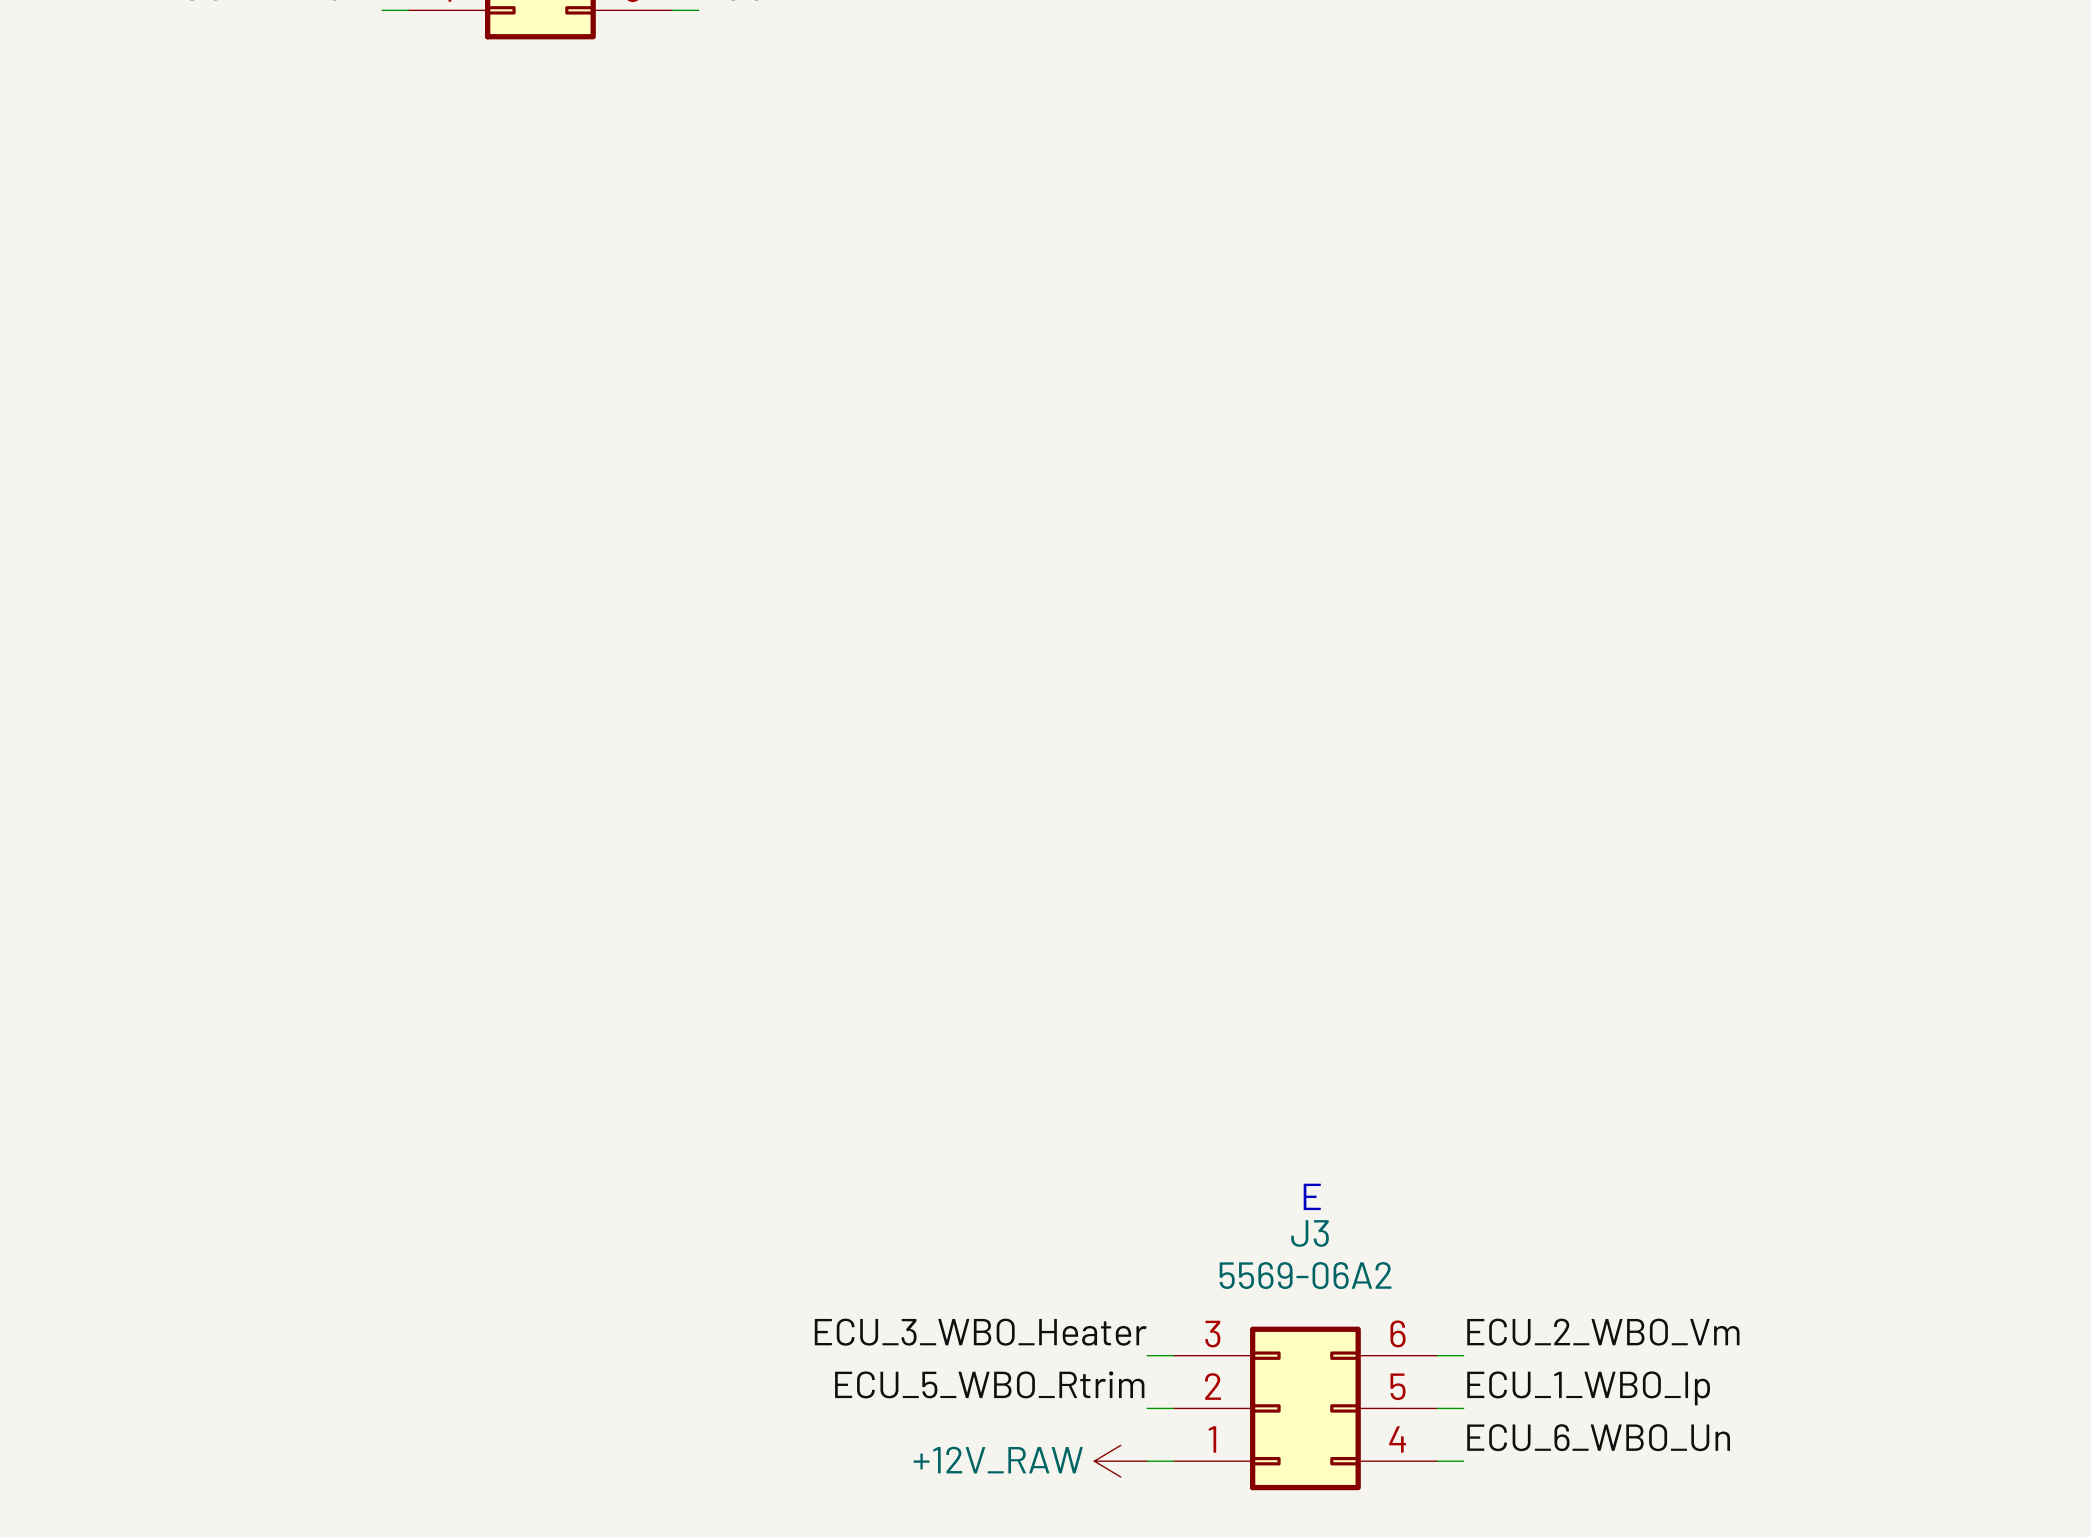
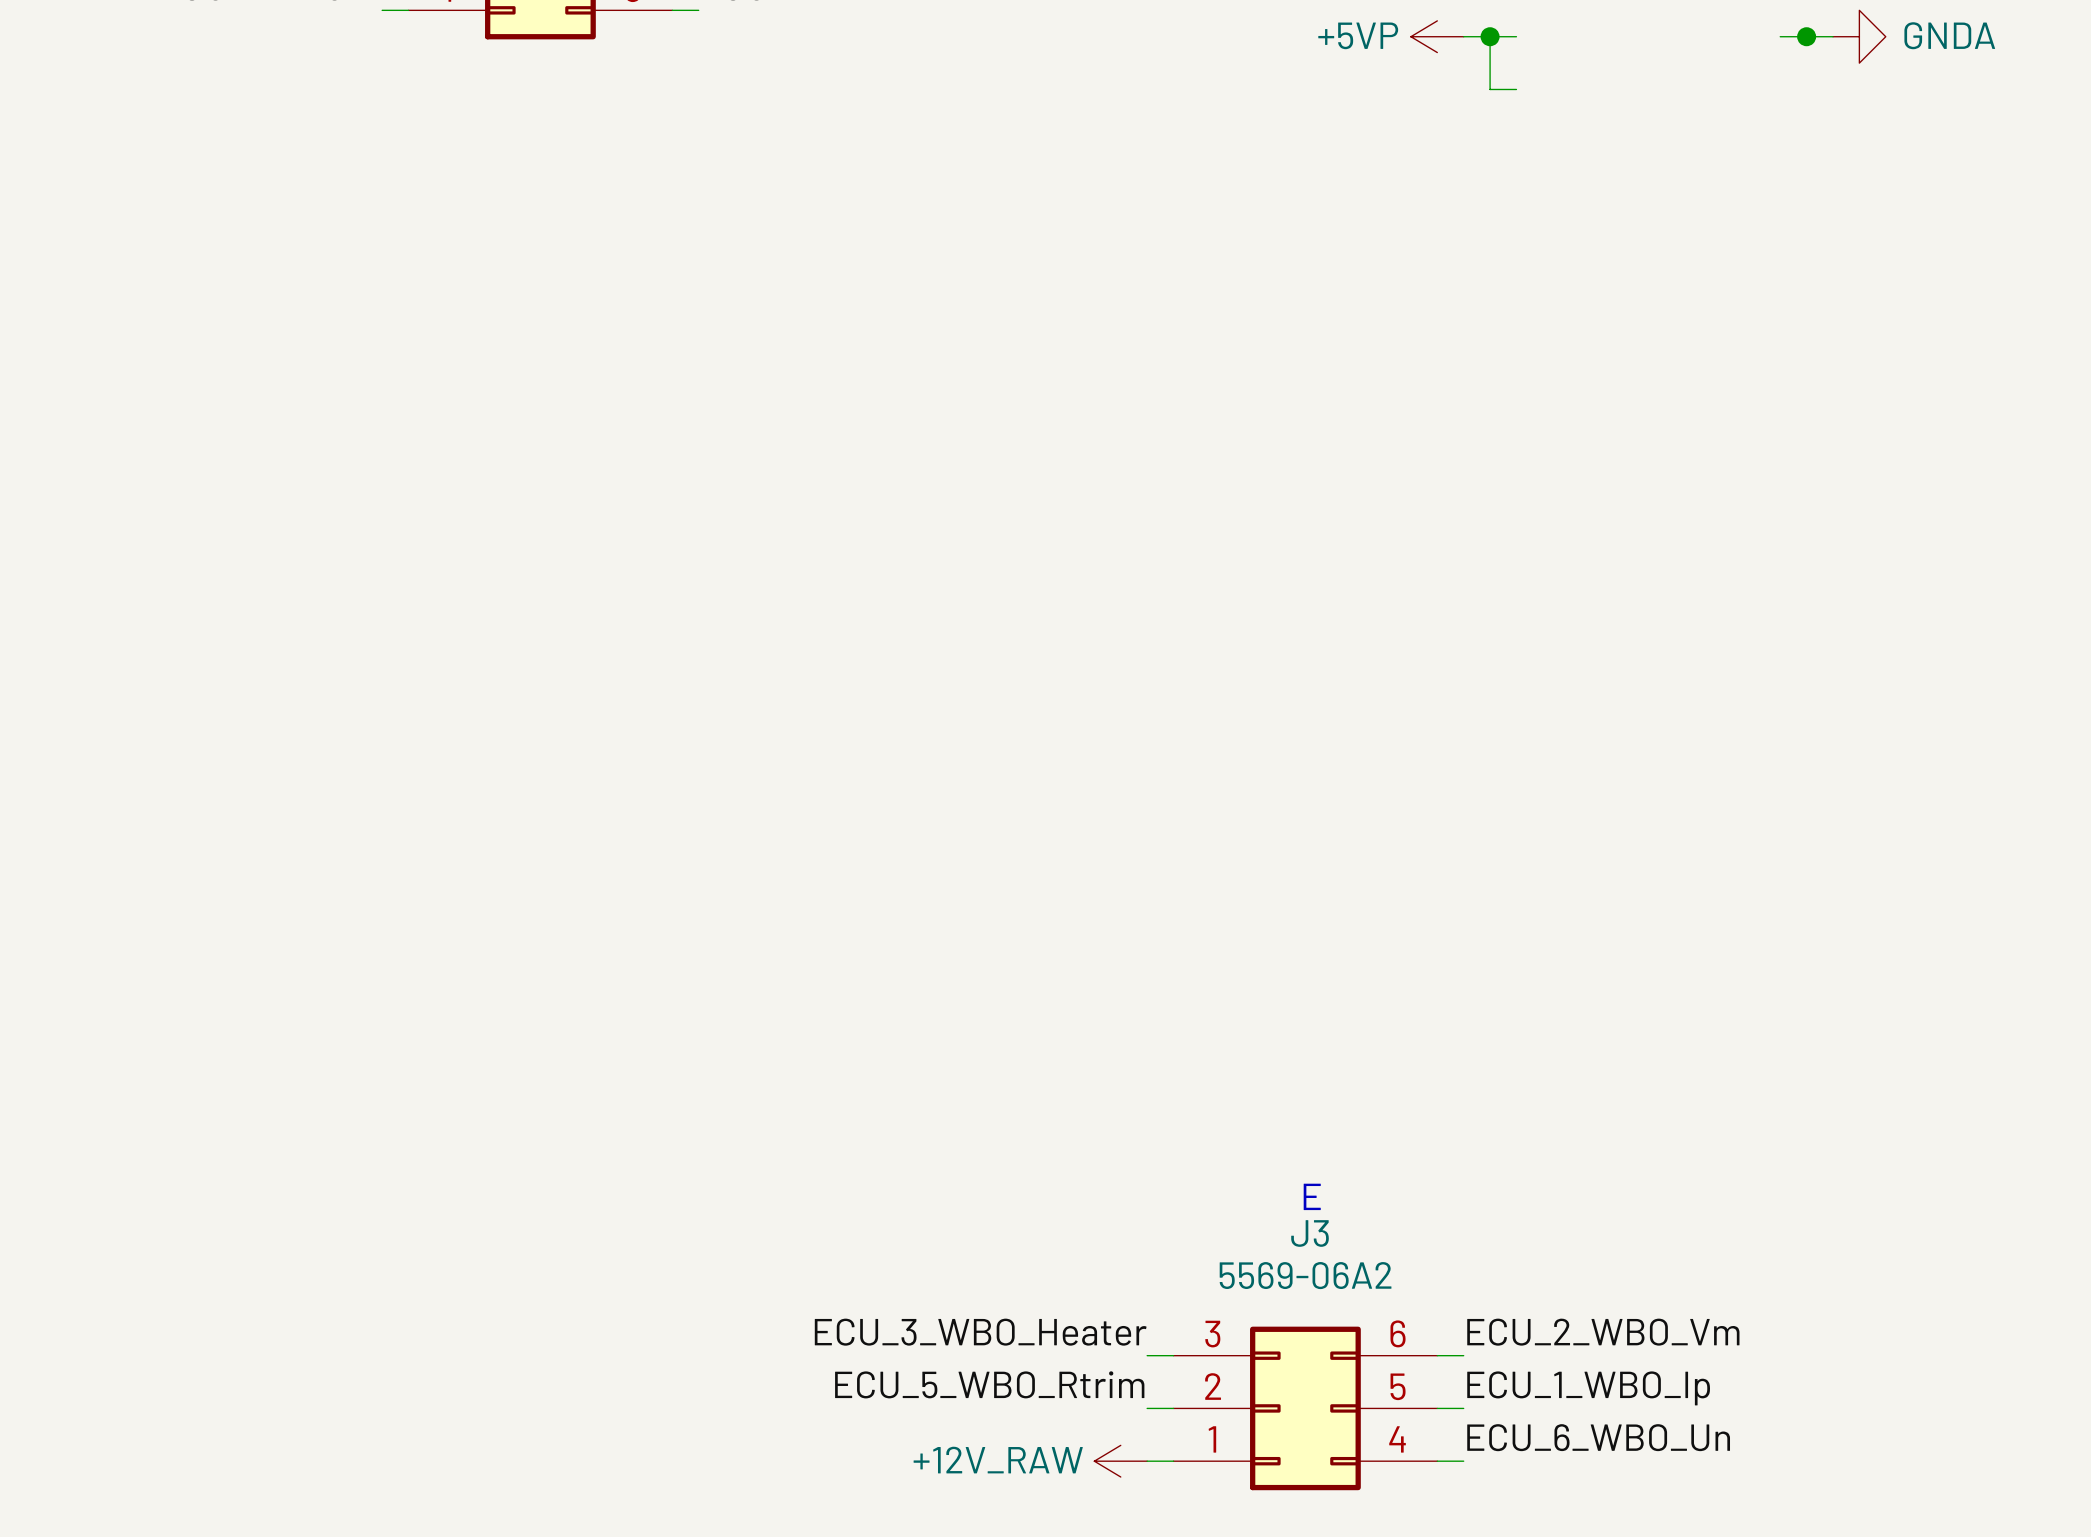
power symbol: none -> +5VP (1437, 36)
wire: none -> (1463, 36) (1516, 36)
wire: none -> (1490, 36) (1490, 89) (1516, 89)
junction: none -> (1490, 36)
wire: none -> (1780, 36) (1833, 36)
junction: none -> (1806, 36)
power symbol: none -> GNDA (1859, 36)

